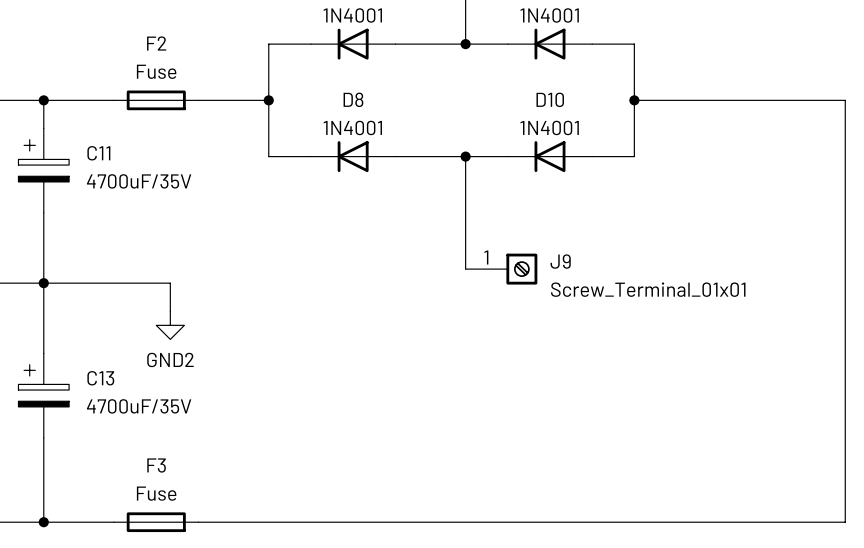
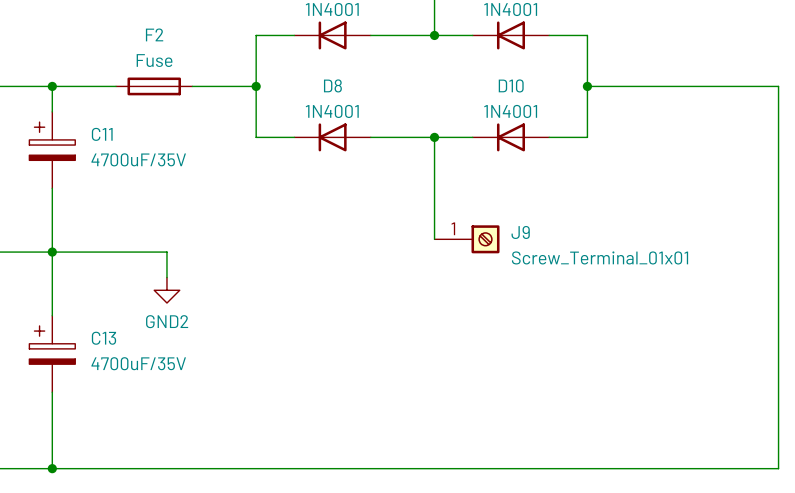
F3: Fuse (156, 522) -> none

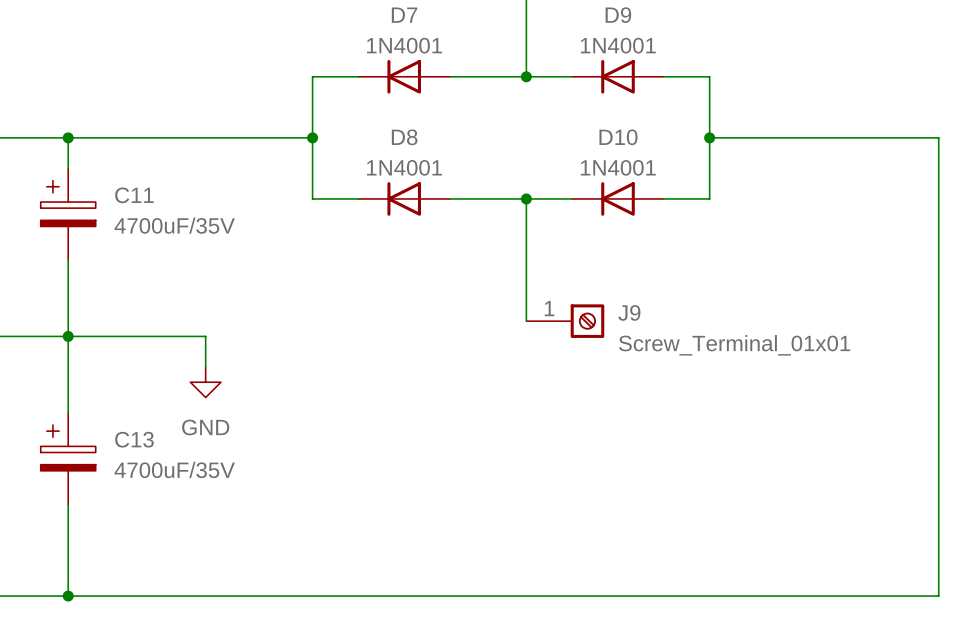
F2: Fuse (154, 86) -> none
power symbol: GND2 (166, 290) -> GND (205, 382)

